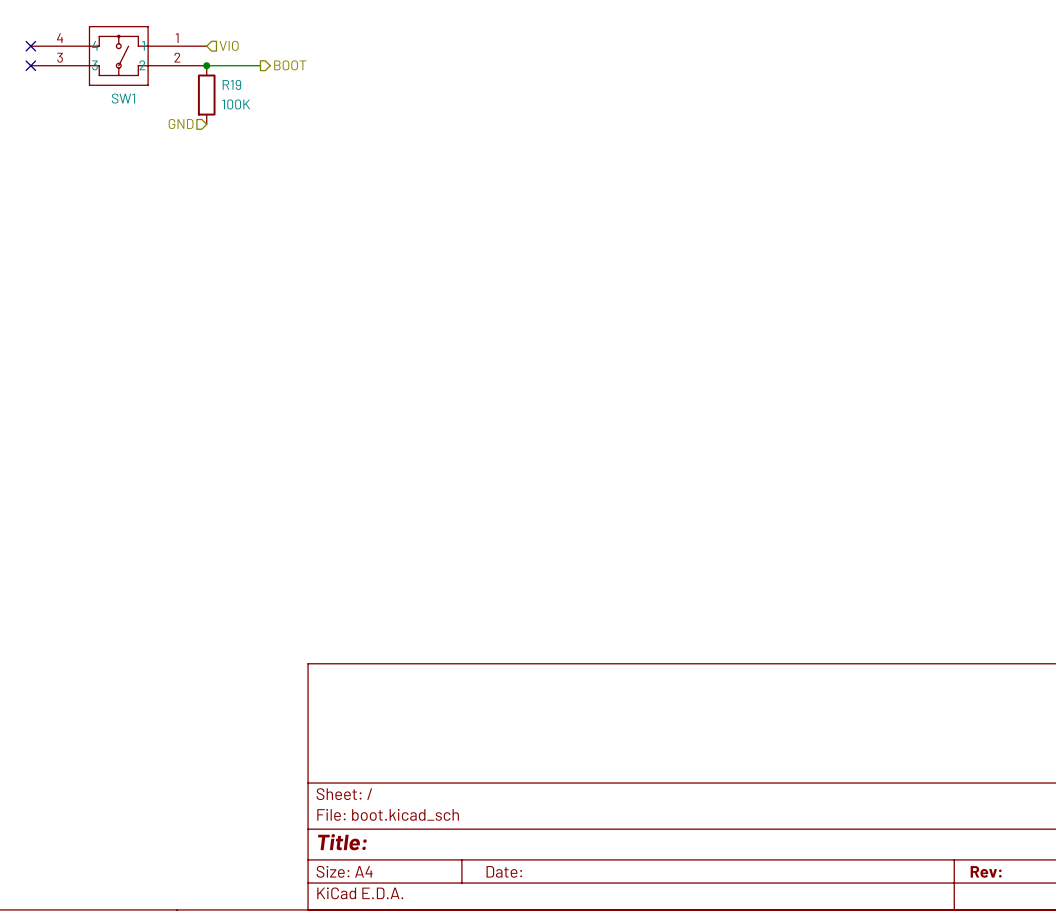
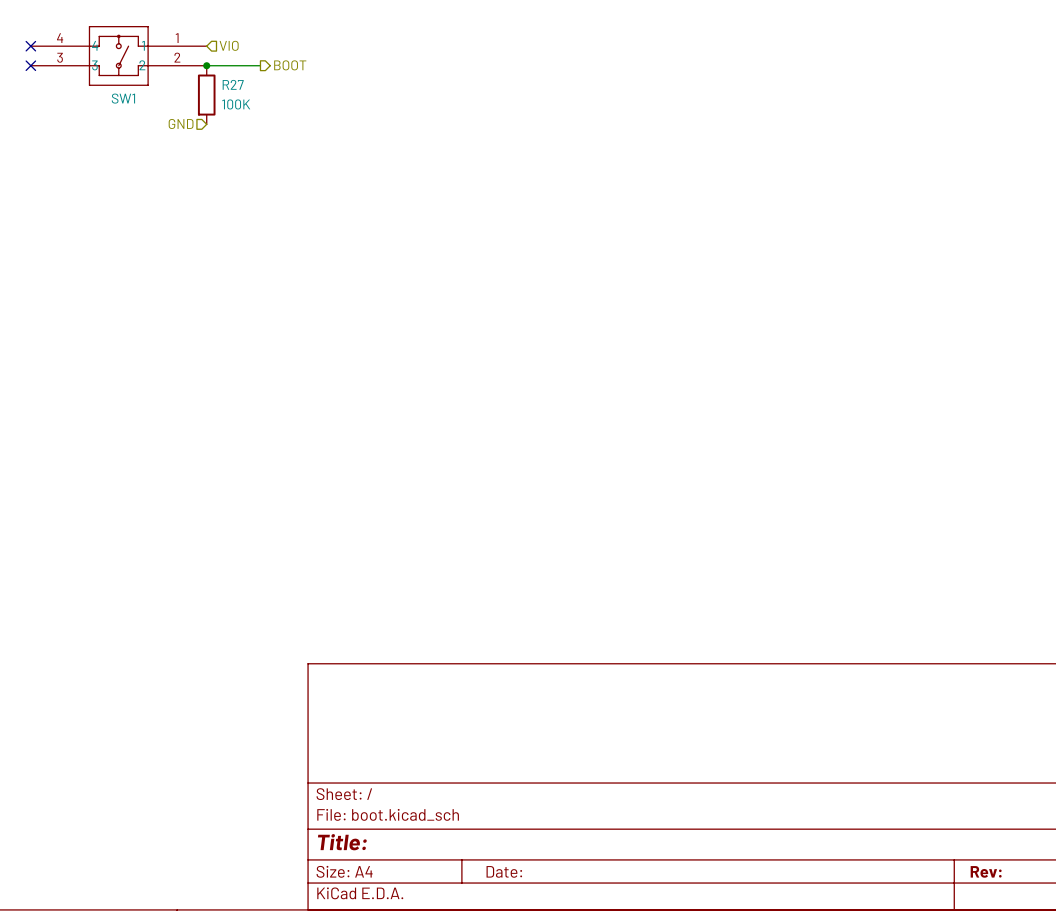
R19 name: R19 (231, 84) -> R27 (233, 84)

